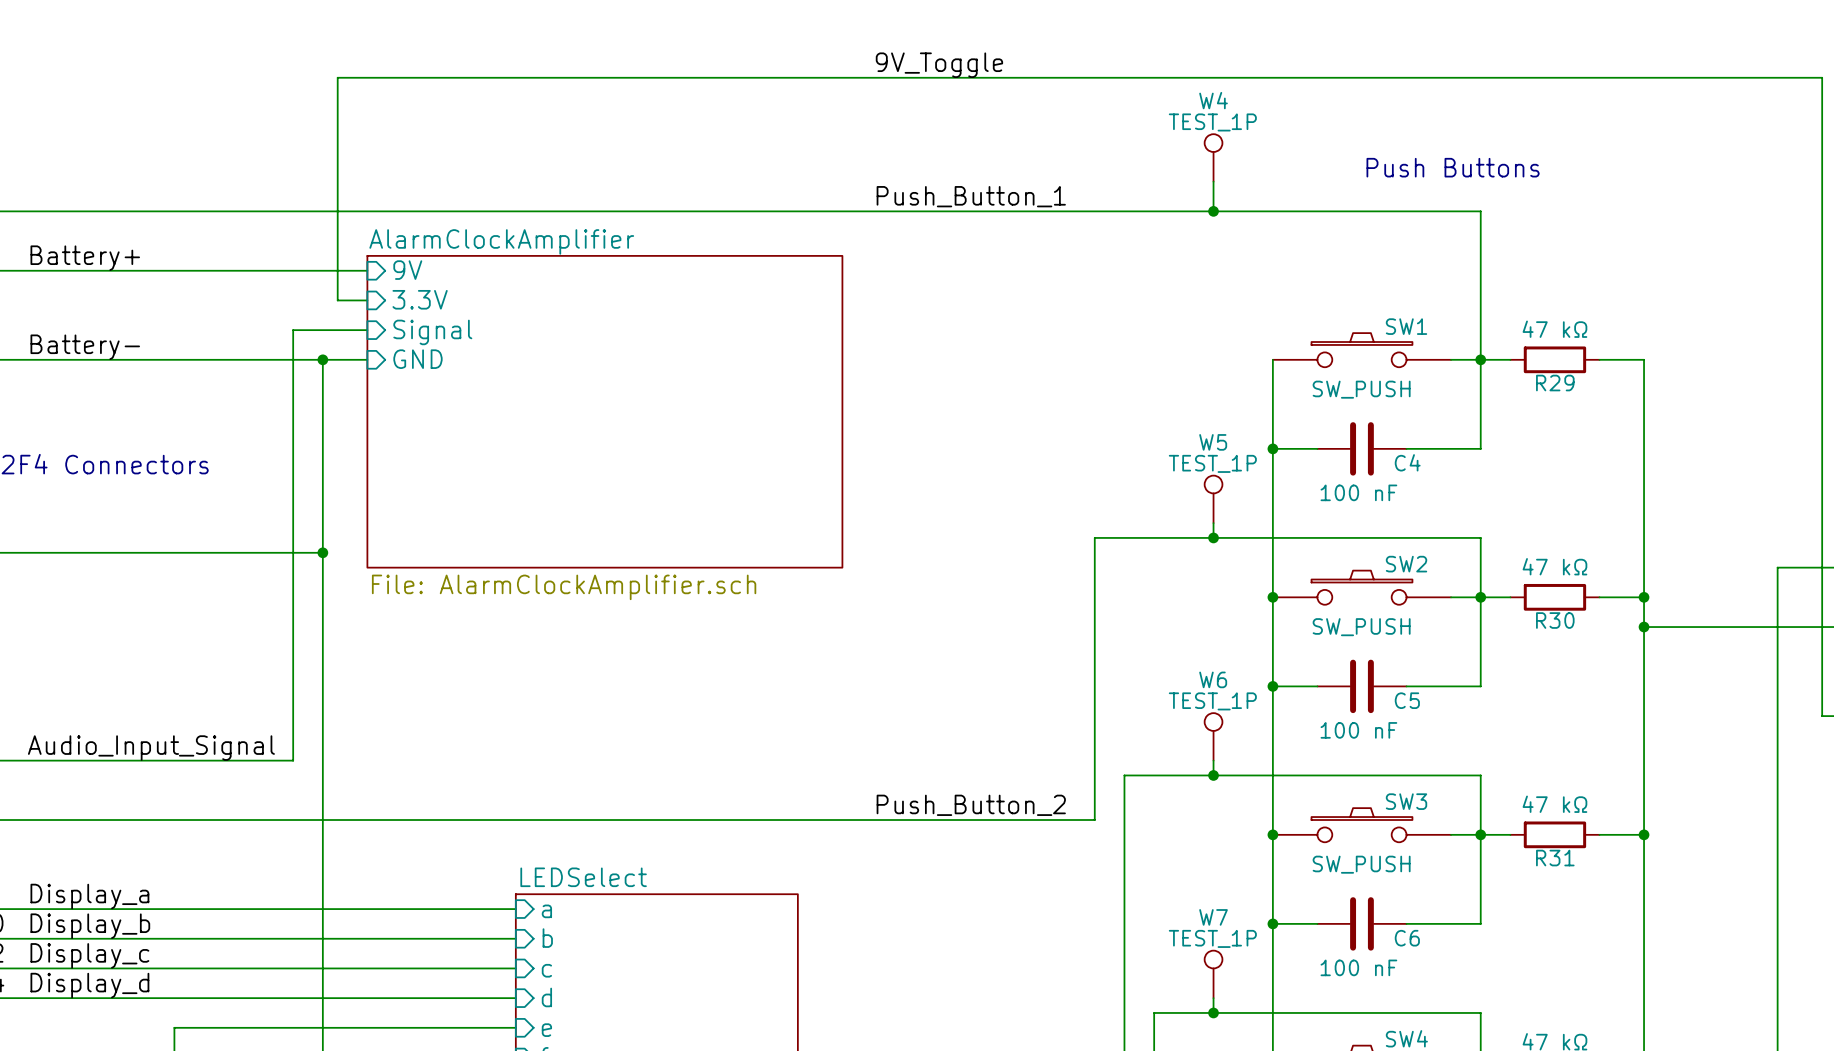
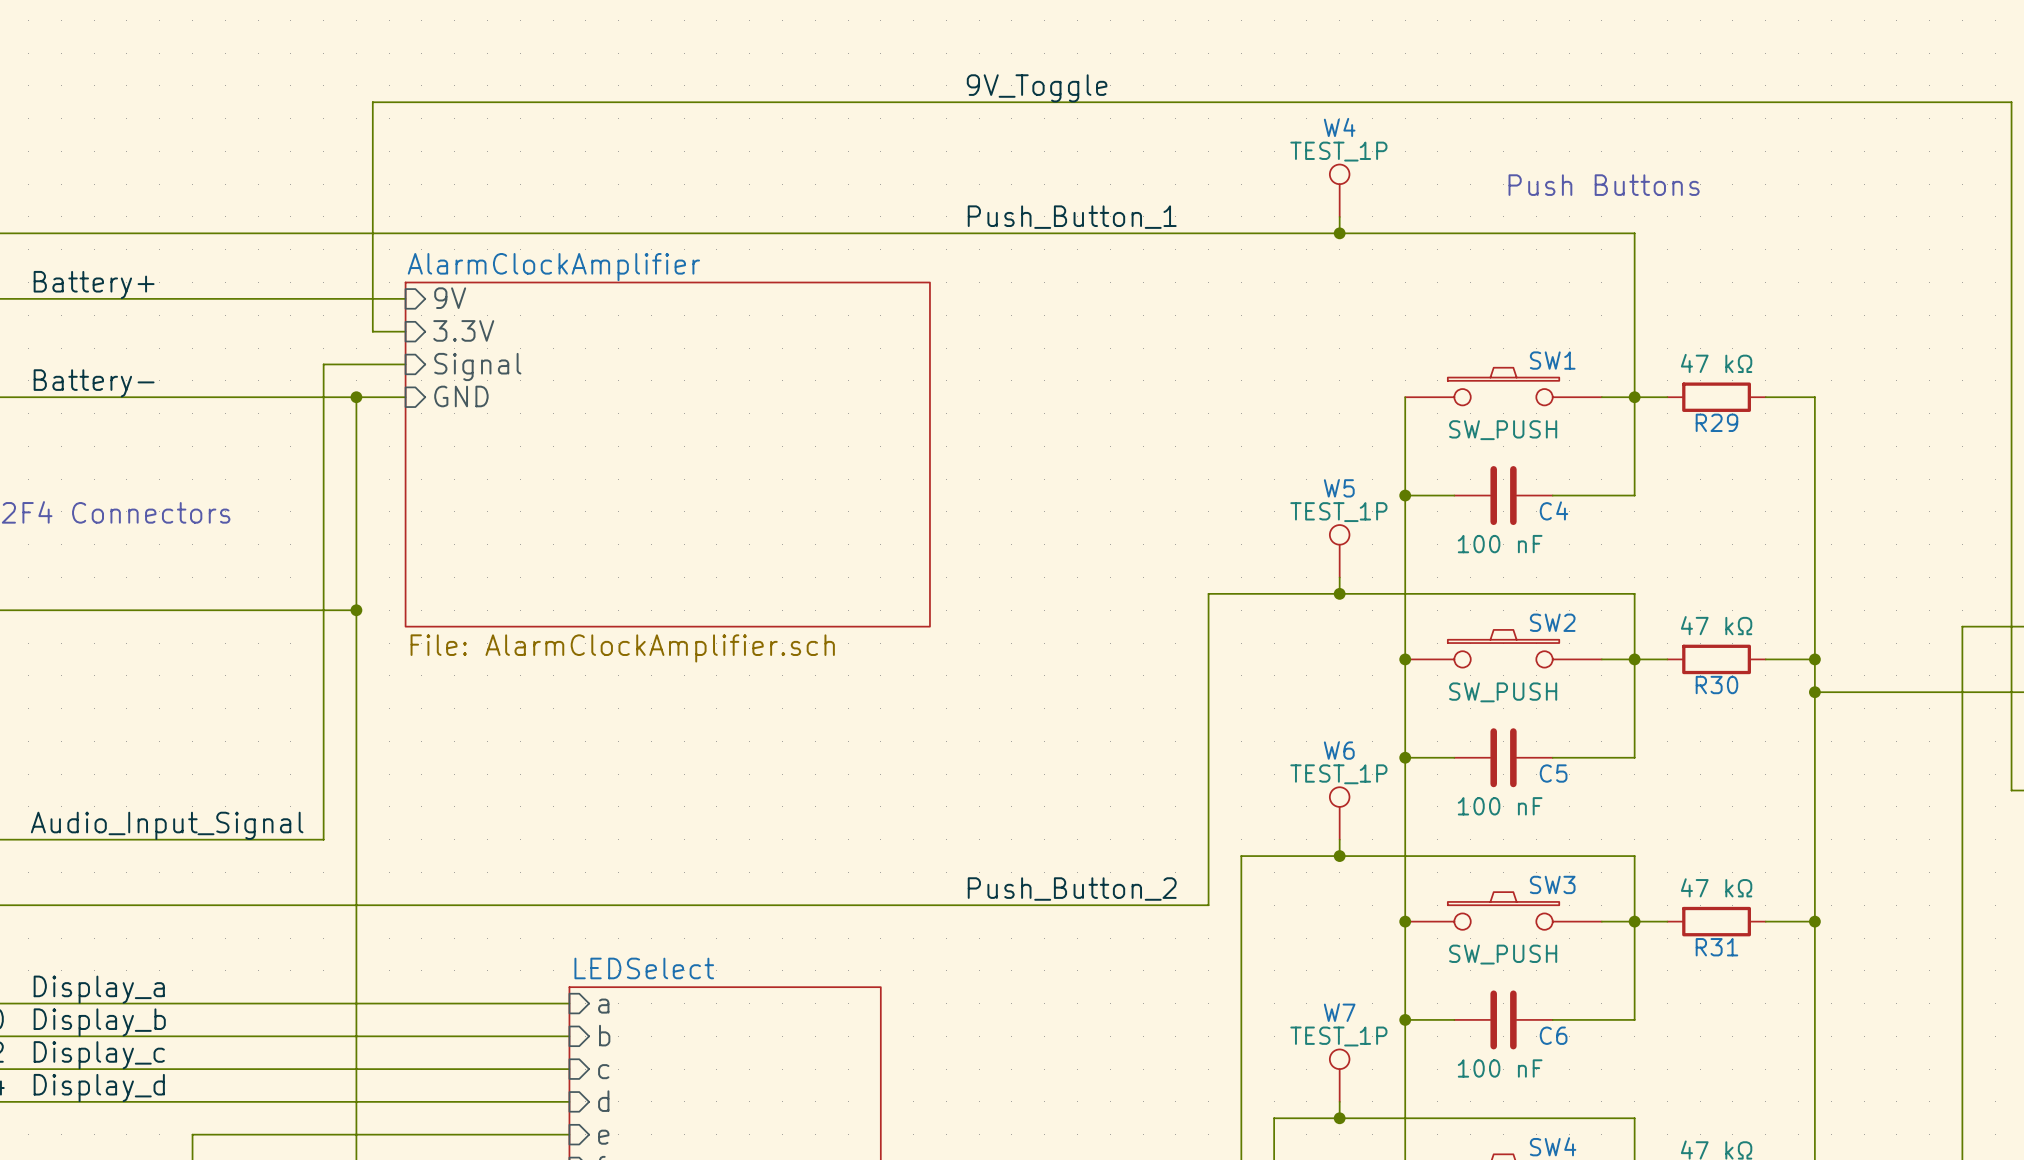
label position: 9V_Toggle (939, 65) -> 9V_Toggle (1037, 88)
wire: (337, 92) (337, 77) (1822, 77) (1822, 92) -> (372, 102) (2011, 102)
W4 position: (1213, 157) -> (1339, 190)

